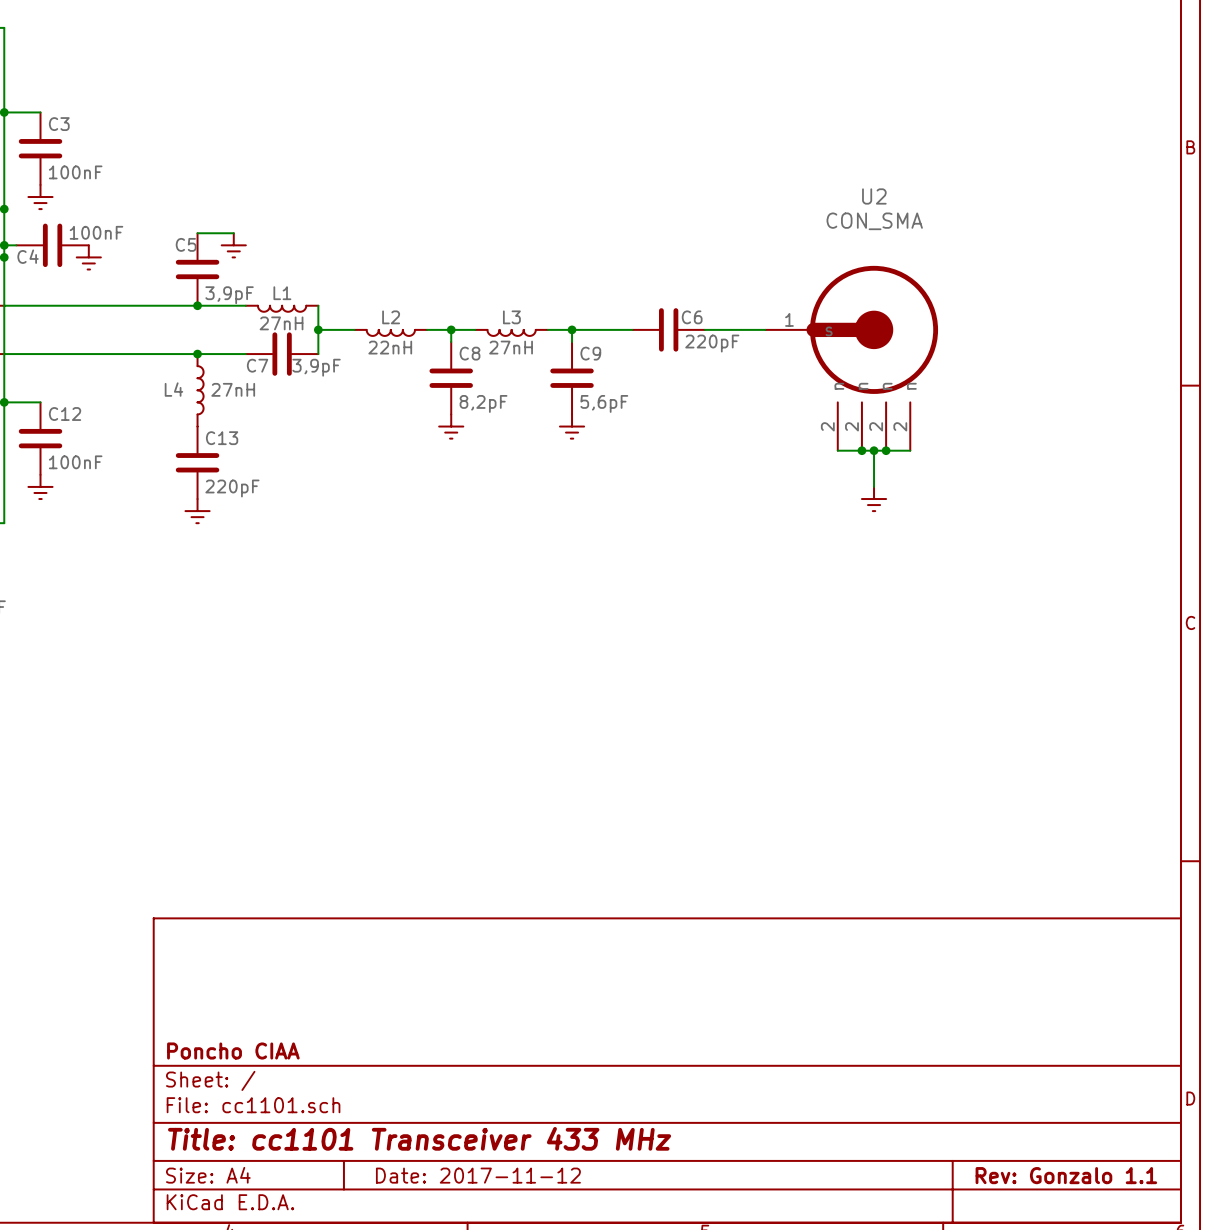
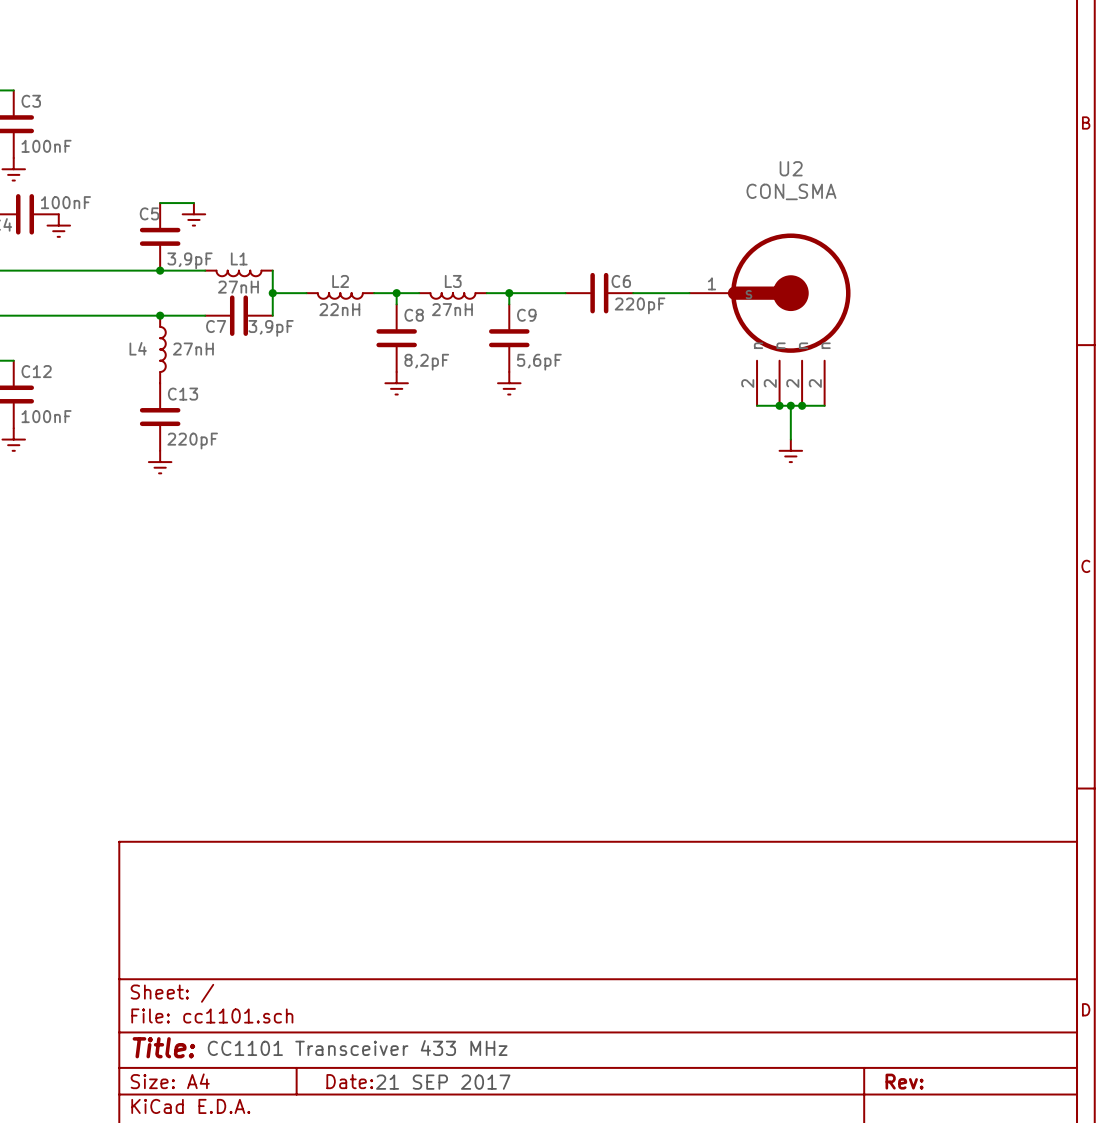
title block: Poncho CIAA (233, 1051) -> none
title block: Title: cc1101 Transceiver 433 MHz (419, 1138) -> Title: (163, 1047)
text: none -> CC1101 Transceiver 433 MHz (357, 1048)
title block: Date: 2017-11-12 (478, 1175) -> Date: (349, 1081)
title block: Rev: Gonzalo 1.1 (1066, 1175) -> Rev: (904, 1081)
text: none -> 21 SEP 2017 (443, 1082)

